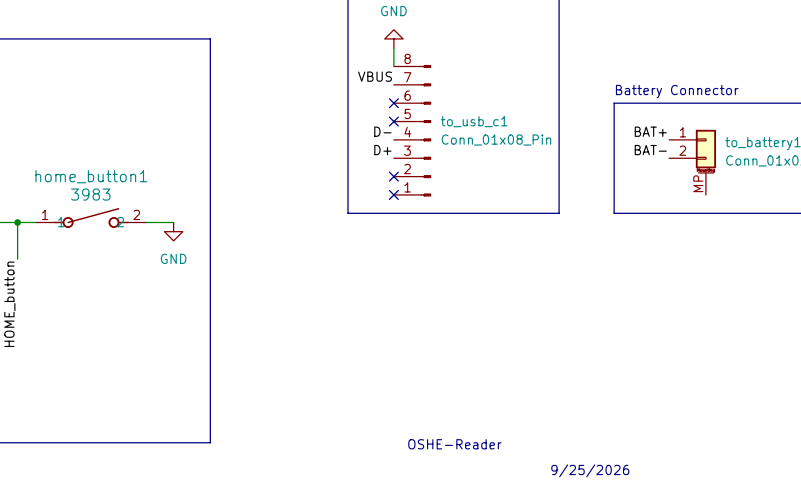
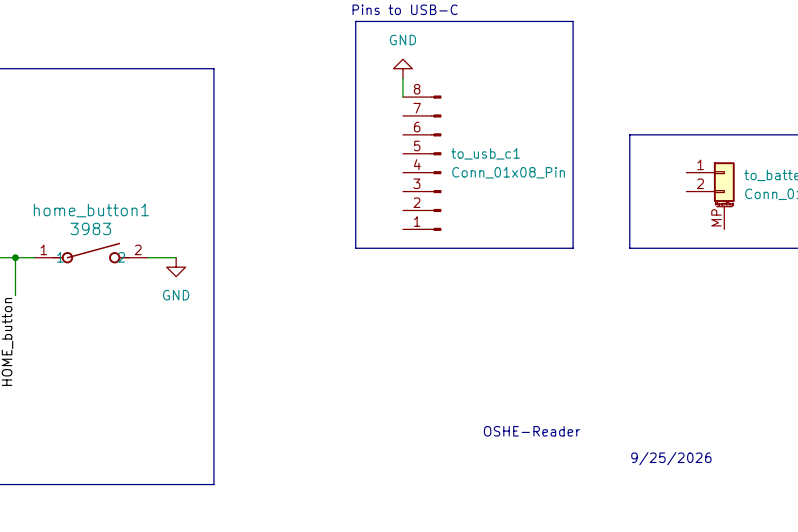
label: VBUS (375, 76) -> none
text: Battery Connector (677, 91) -> none
no-connect mark: (393, 103) -> none
no-connect mark: (393, 121) -> none
label: D- (382, 131) -> none
label: BAT+ (650, 131) -> none
label: D+ (382, 150) -> none
label: BAT- (650, 150) -> none
no-connect mark: (393, 176) -> none
no-connect mark: (393, 194) -> none
text position: OSHE-Reader (454, 444) -> OSHE-Reader (531, 431)
text position: 9/25/2026 (590, 470) -> 9/25/2026 (671, 458)

